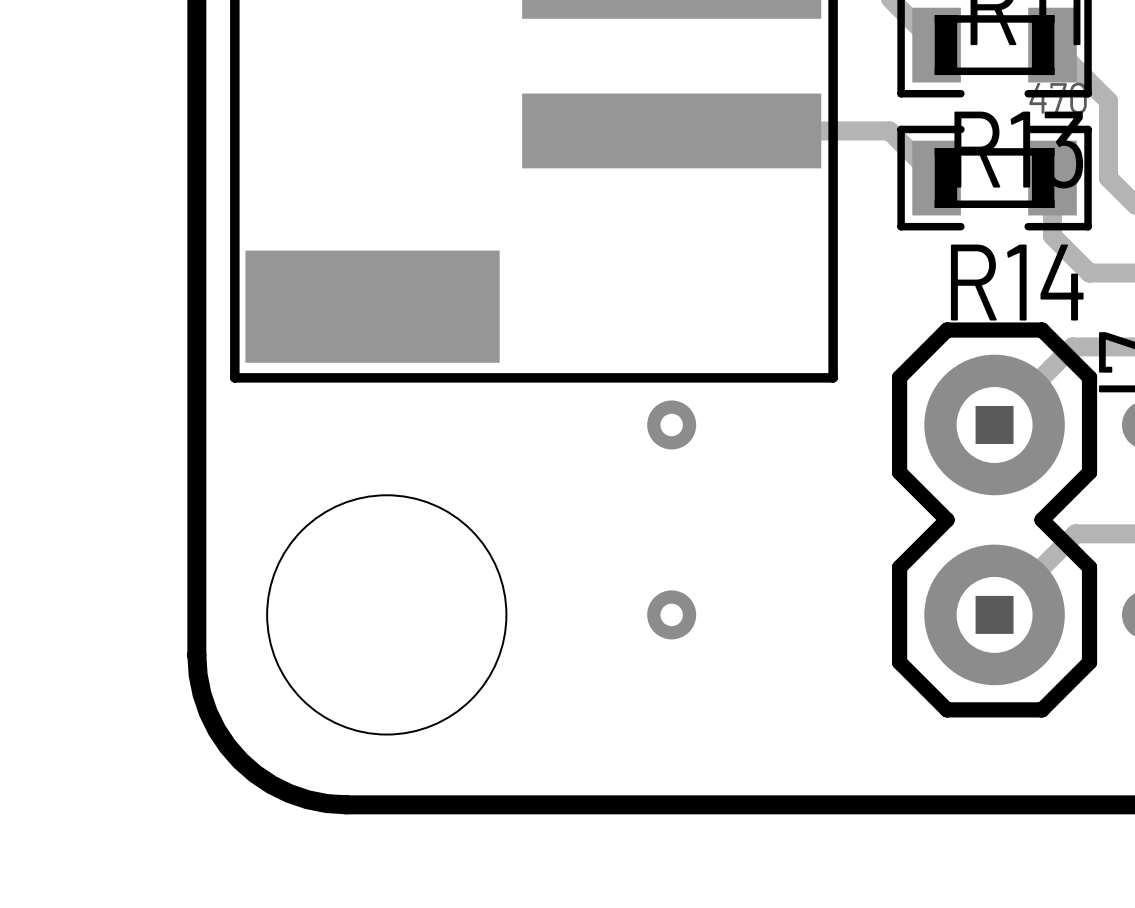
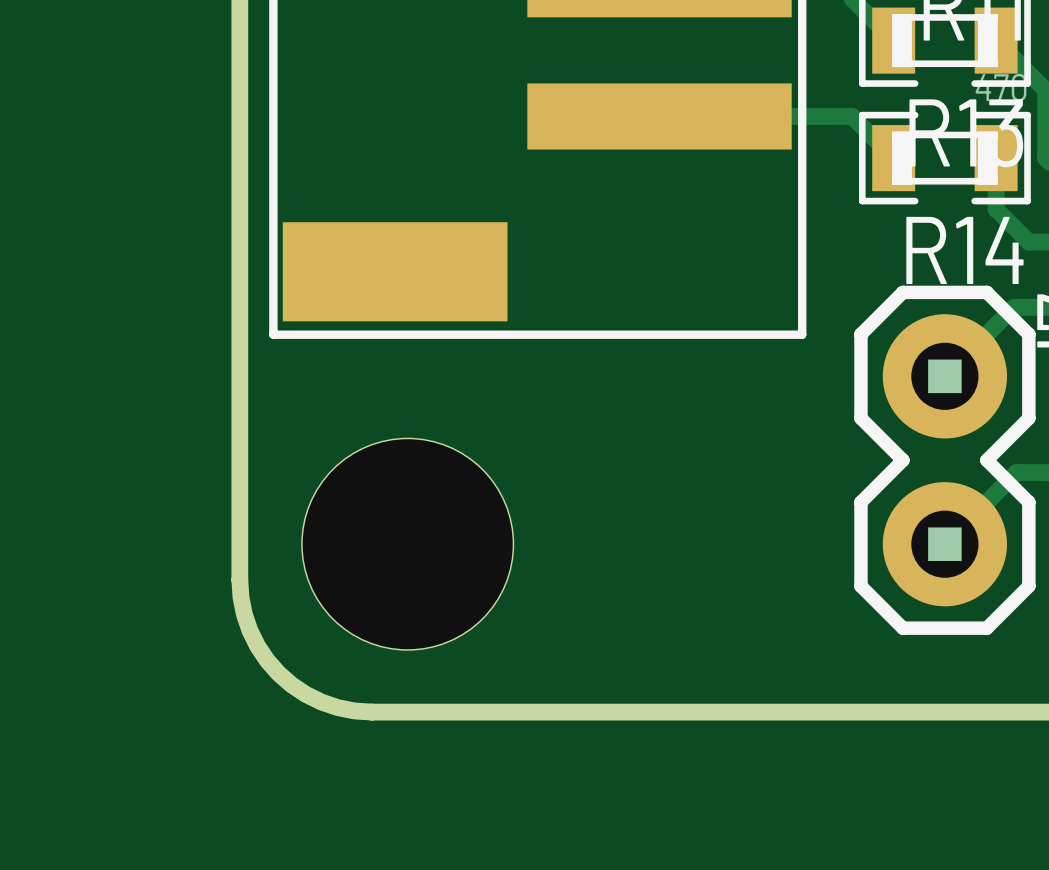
via: (671, 424) -> none
via: (671, 614) -> none

